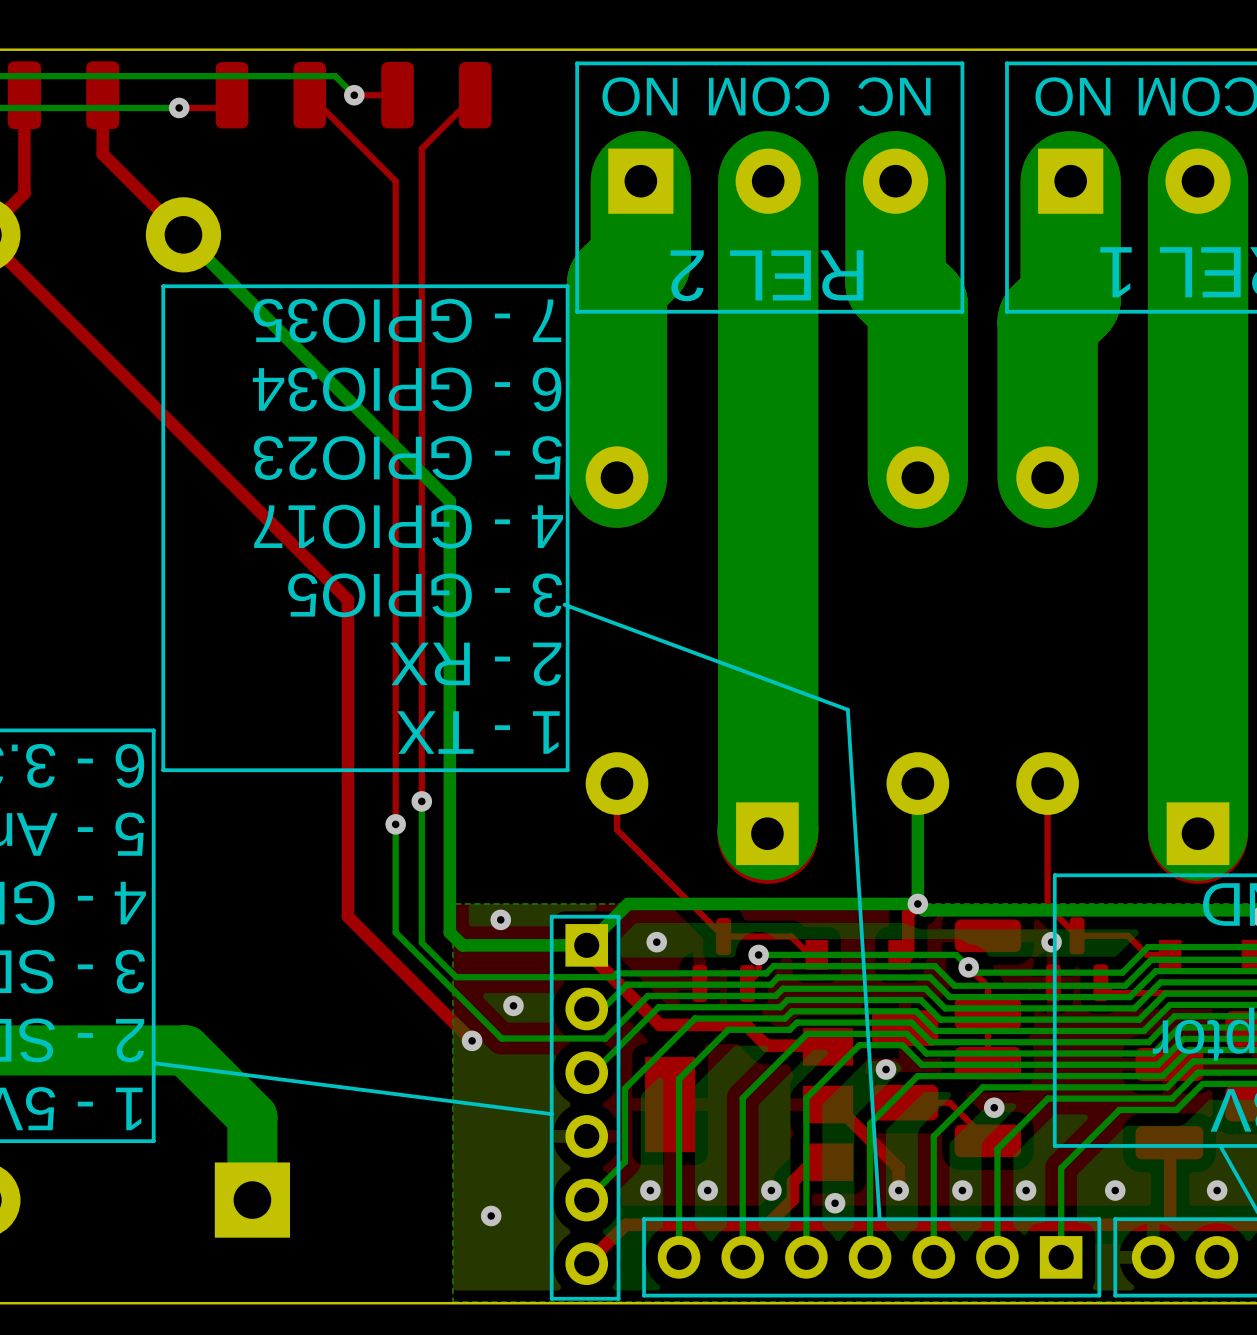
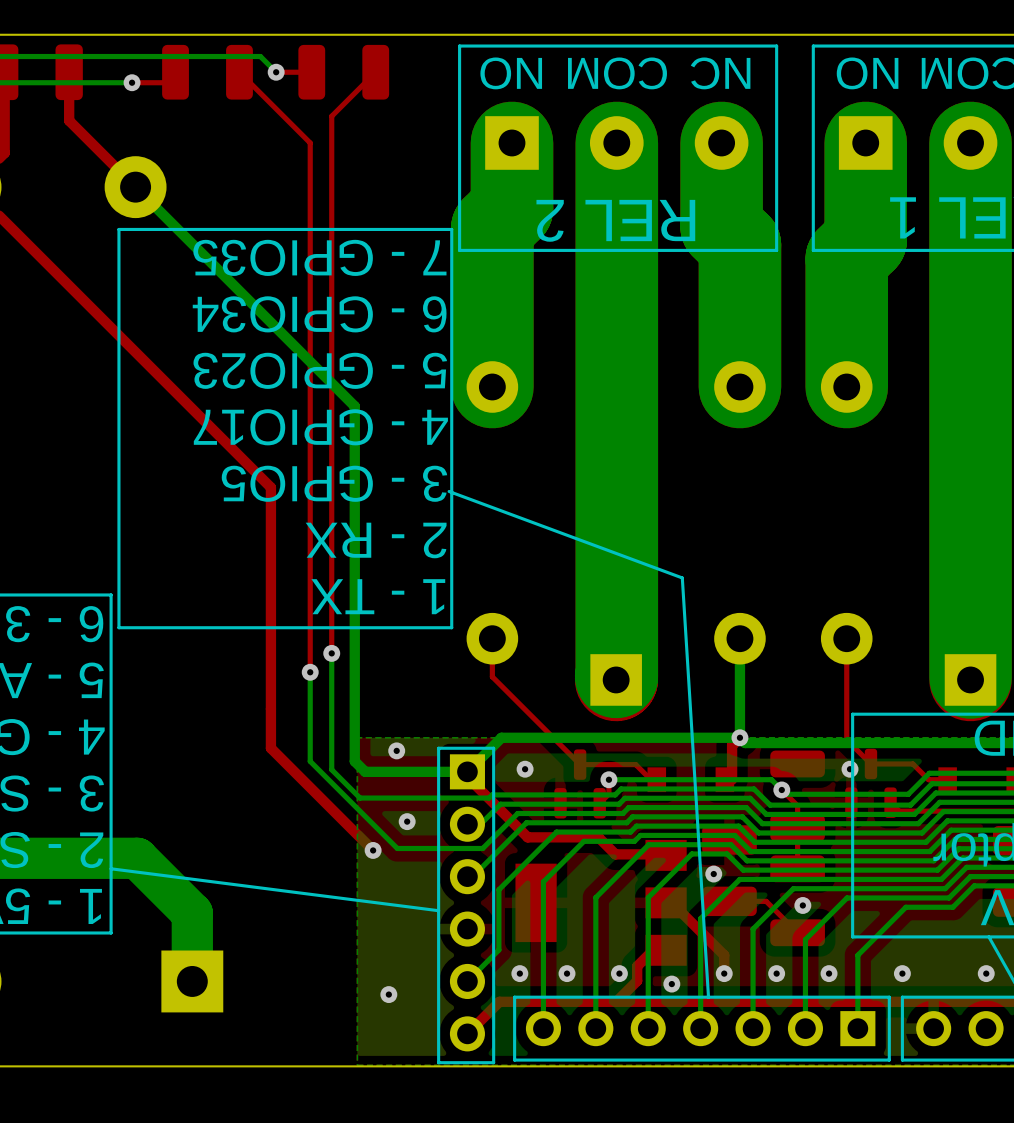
part: (1169, 1103) -> none
top track: (1169, 1142) (1170, 1224) -> none

